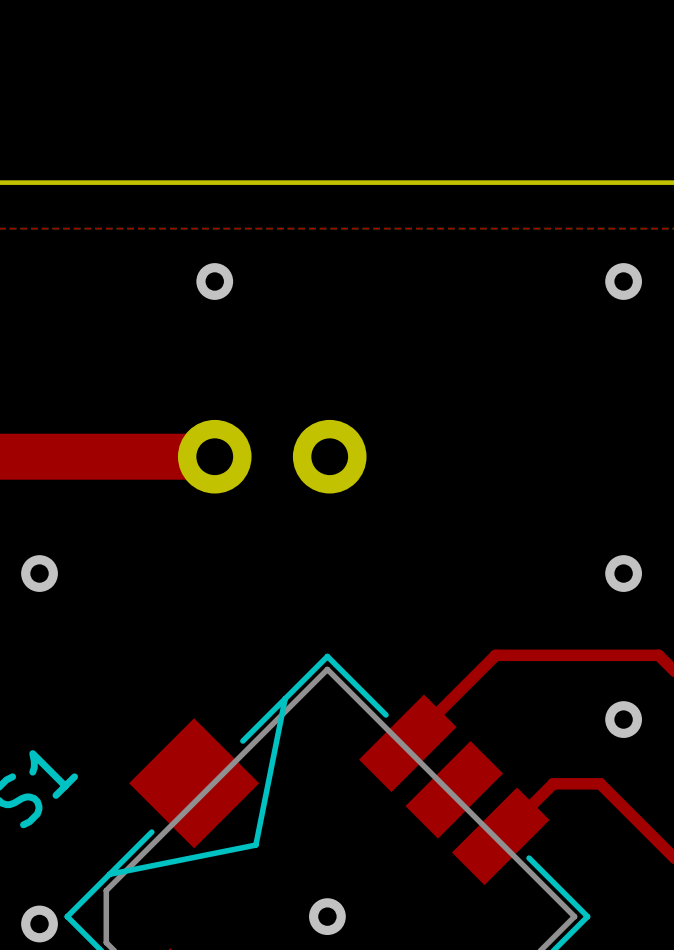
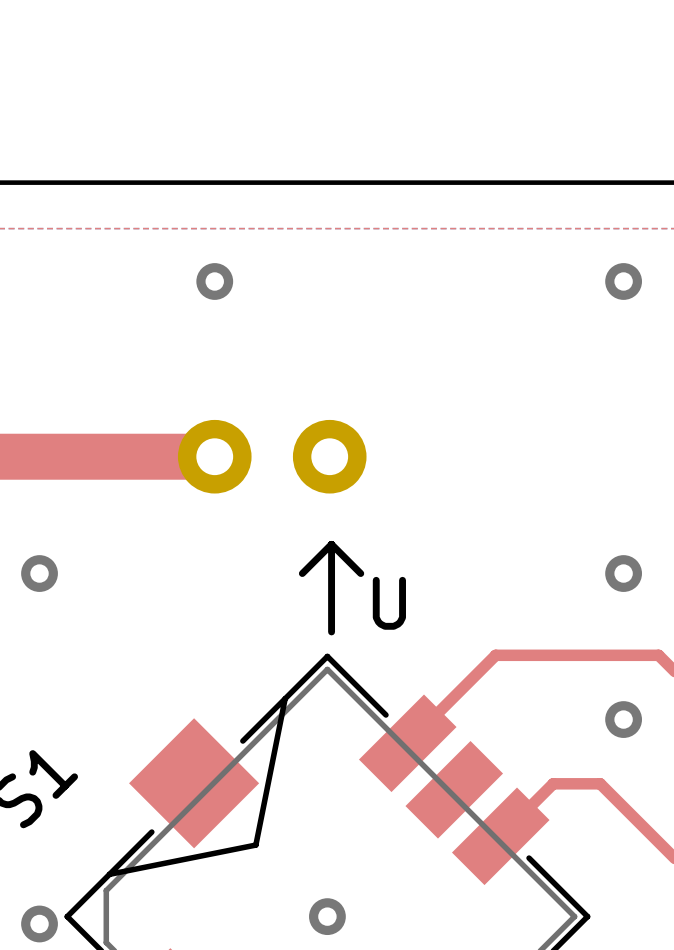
line: none -> (331, 544) (360, 573)
line: none -> (331, 544) (302, 573)
line: none -> (331, 544) (331, 631)
text: none -> U (389, 603)

